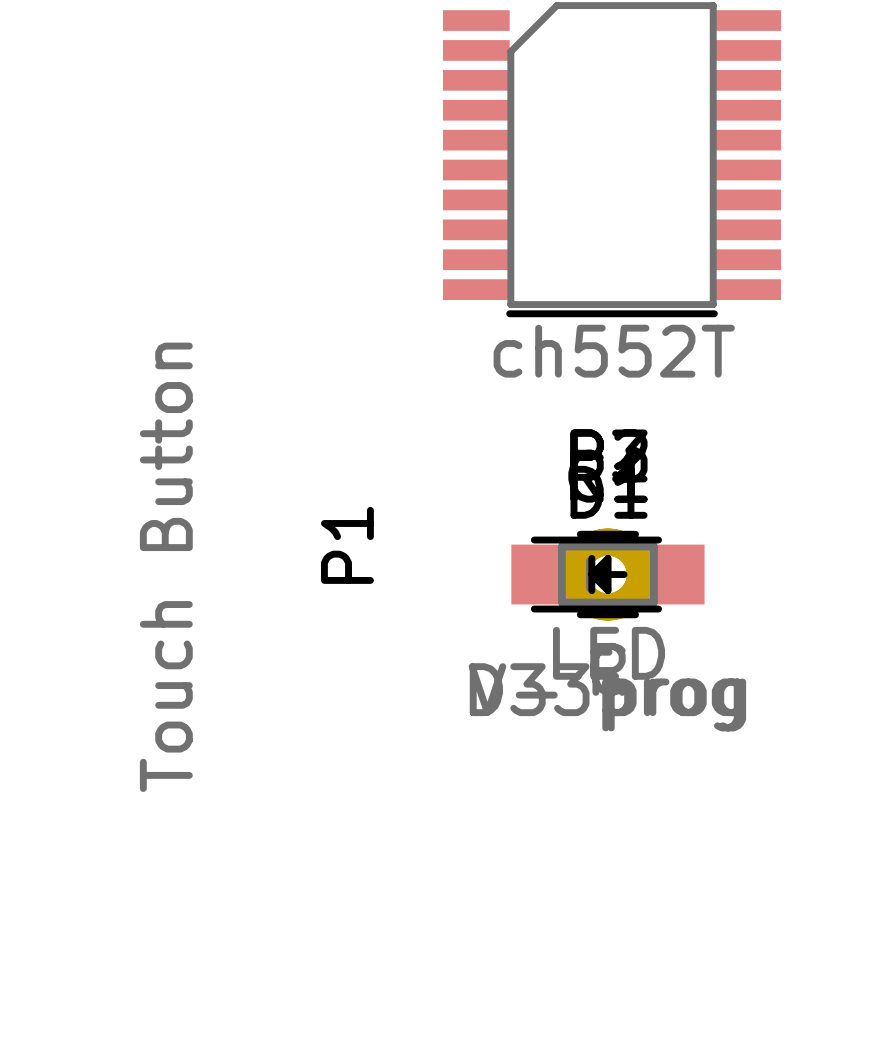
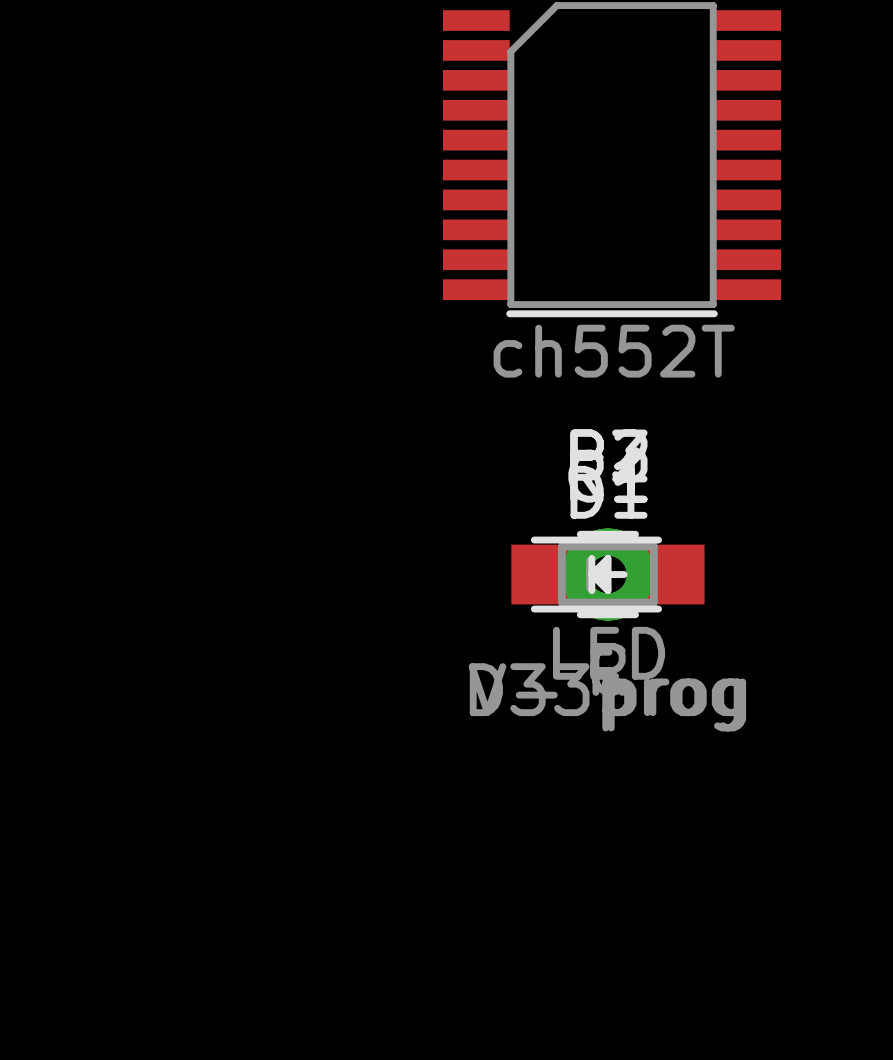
P1: Touch Button (256, 567) -> none

